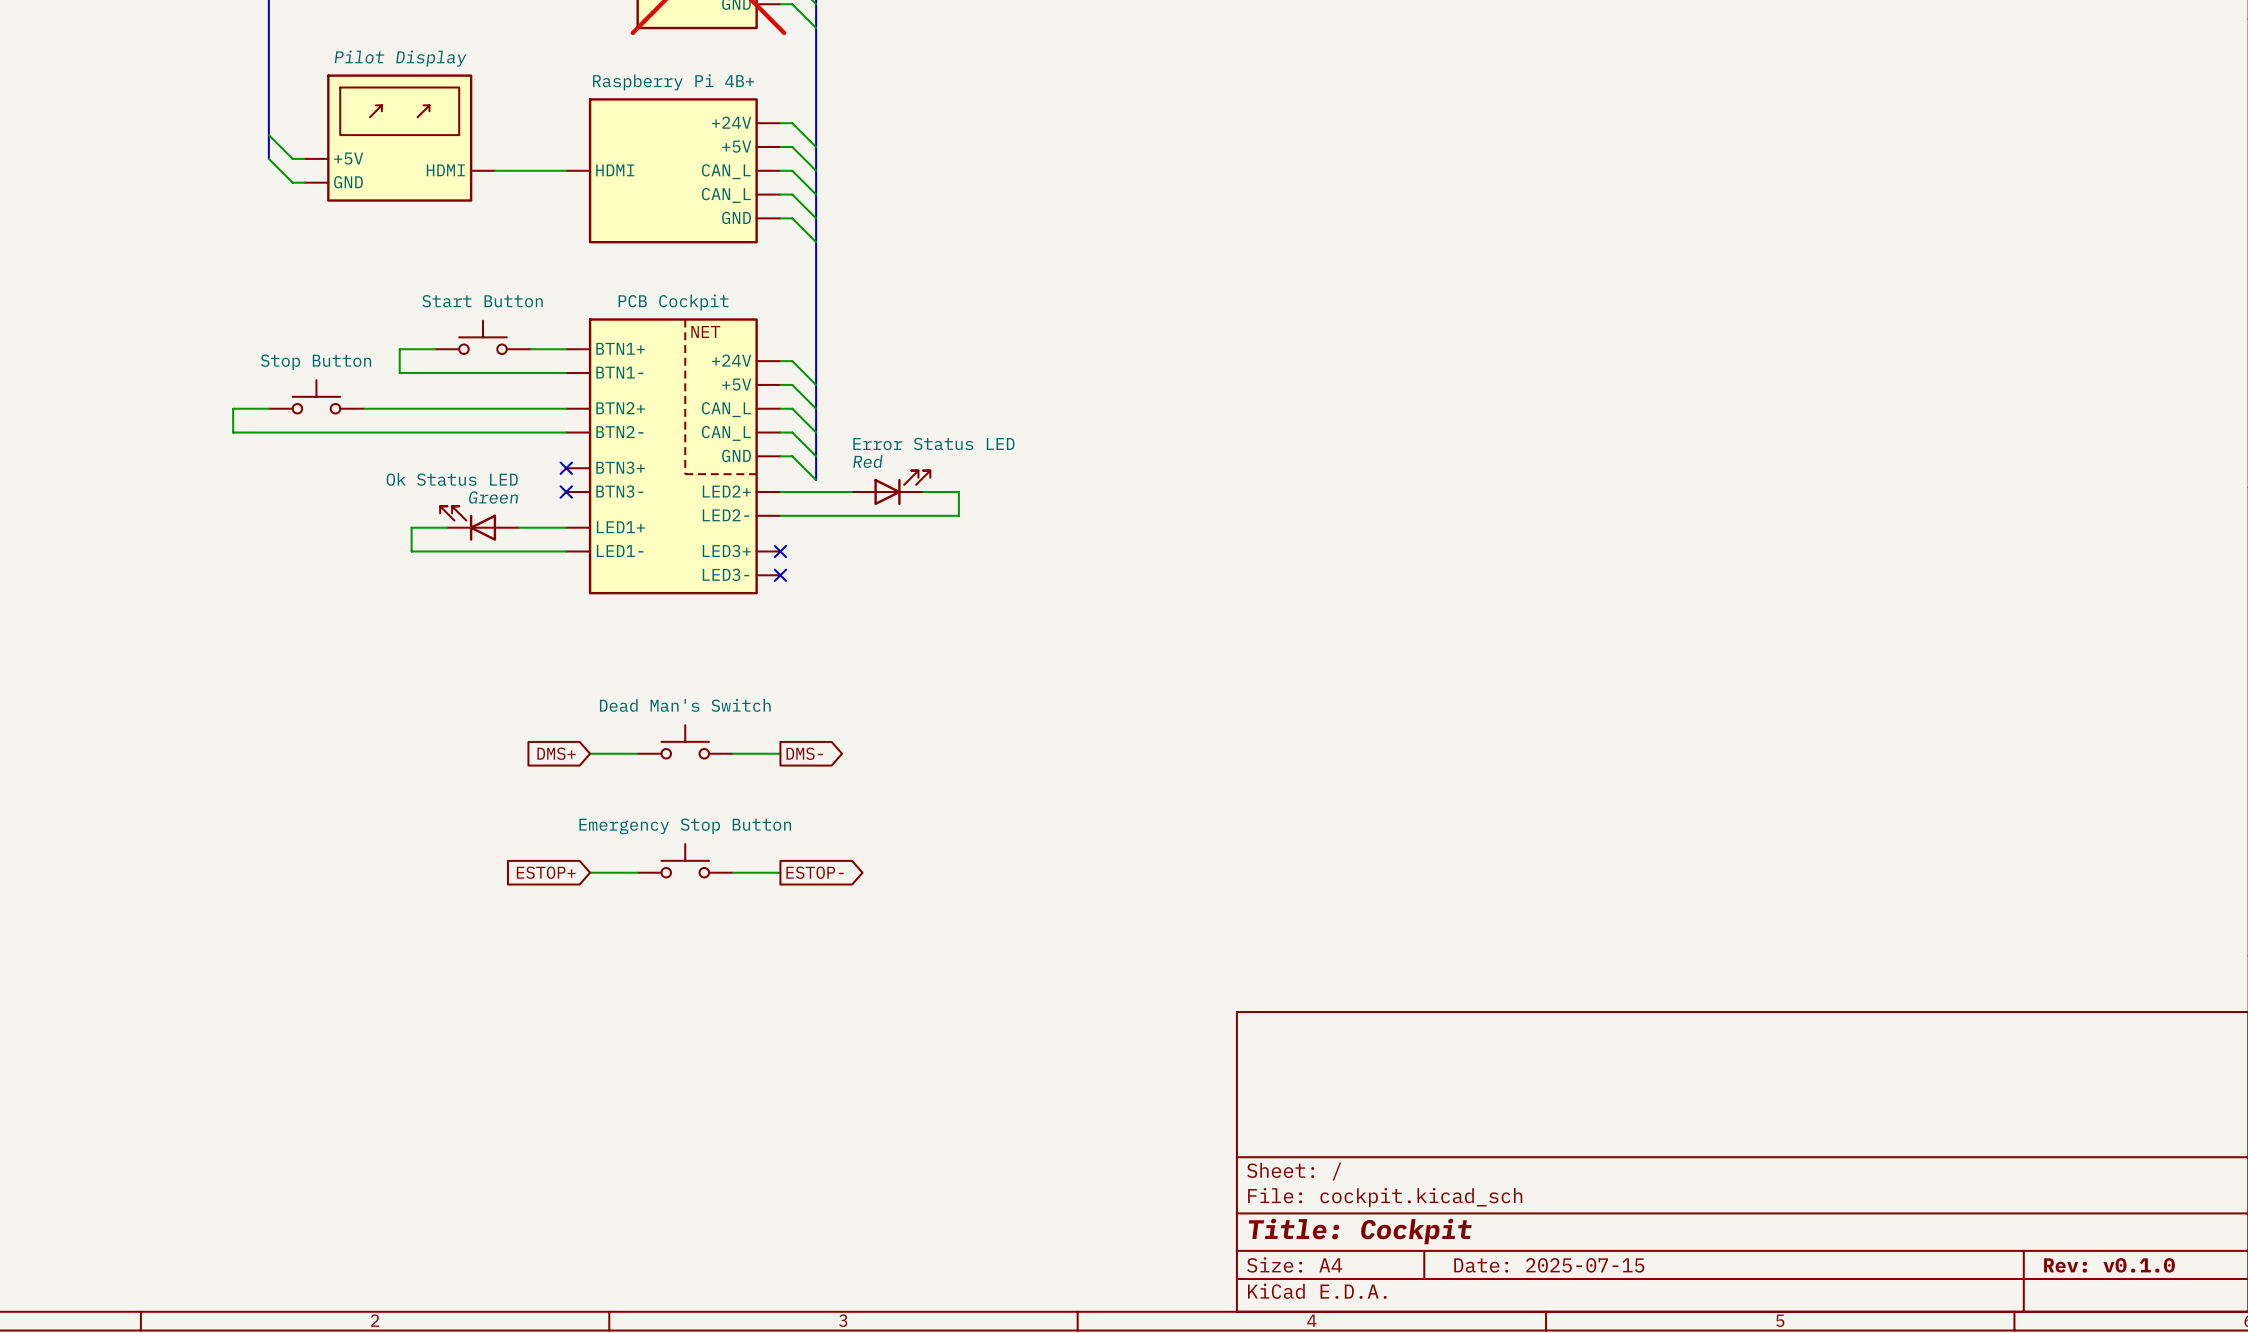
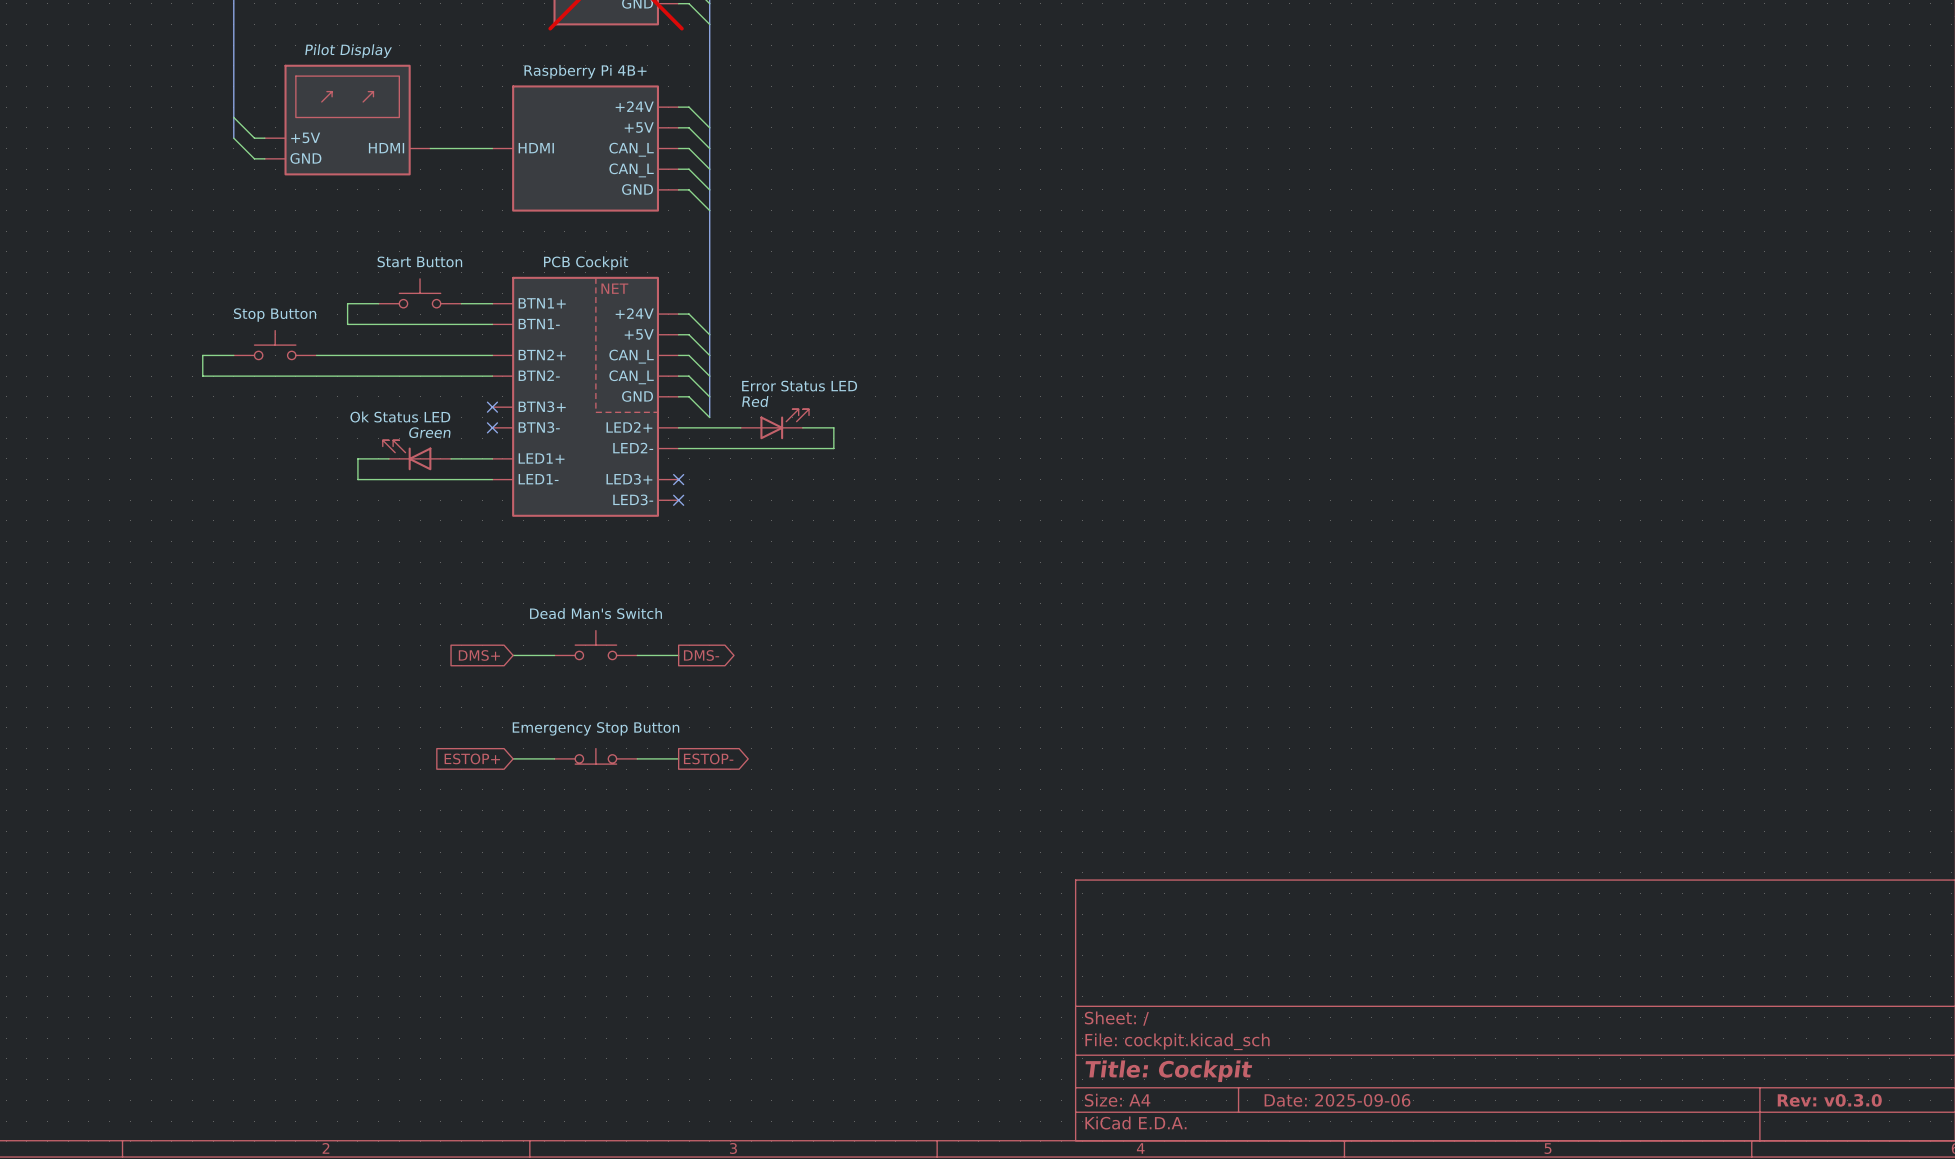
part symbol: [637, 844, 733, 878] -> [554, 748, 638, 765]
title block: Date: 2025-07-15 (1549, 1265) -> Date: 2025-09-06 (1337, 1100)
title block: Rev: v0.1.0 (2109, 1265) -> Rev: v0.3.0 (1829, 1100)

